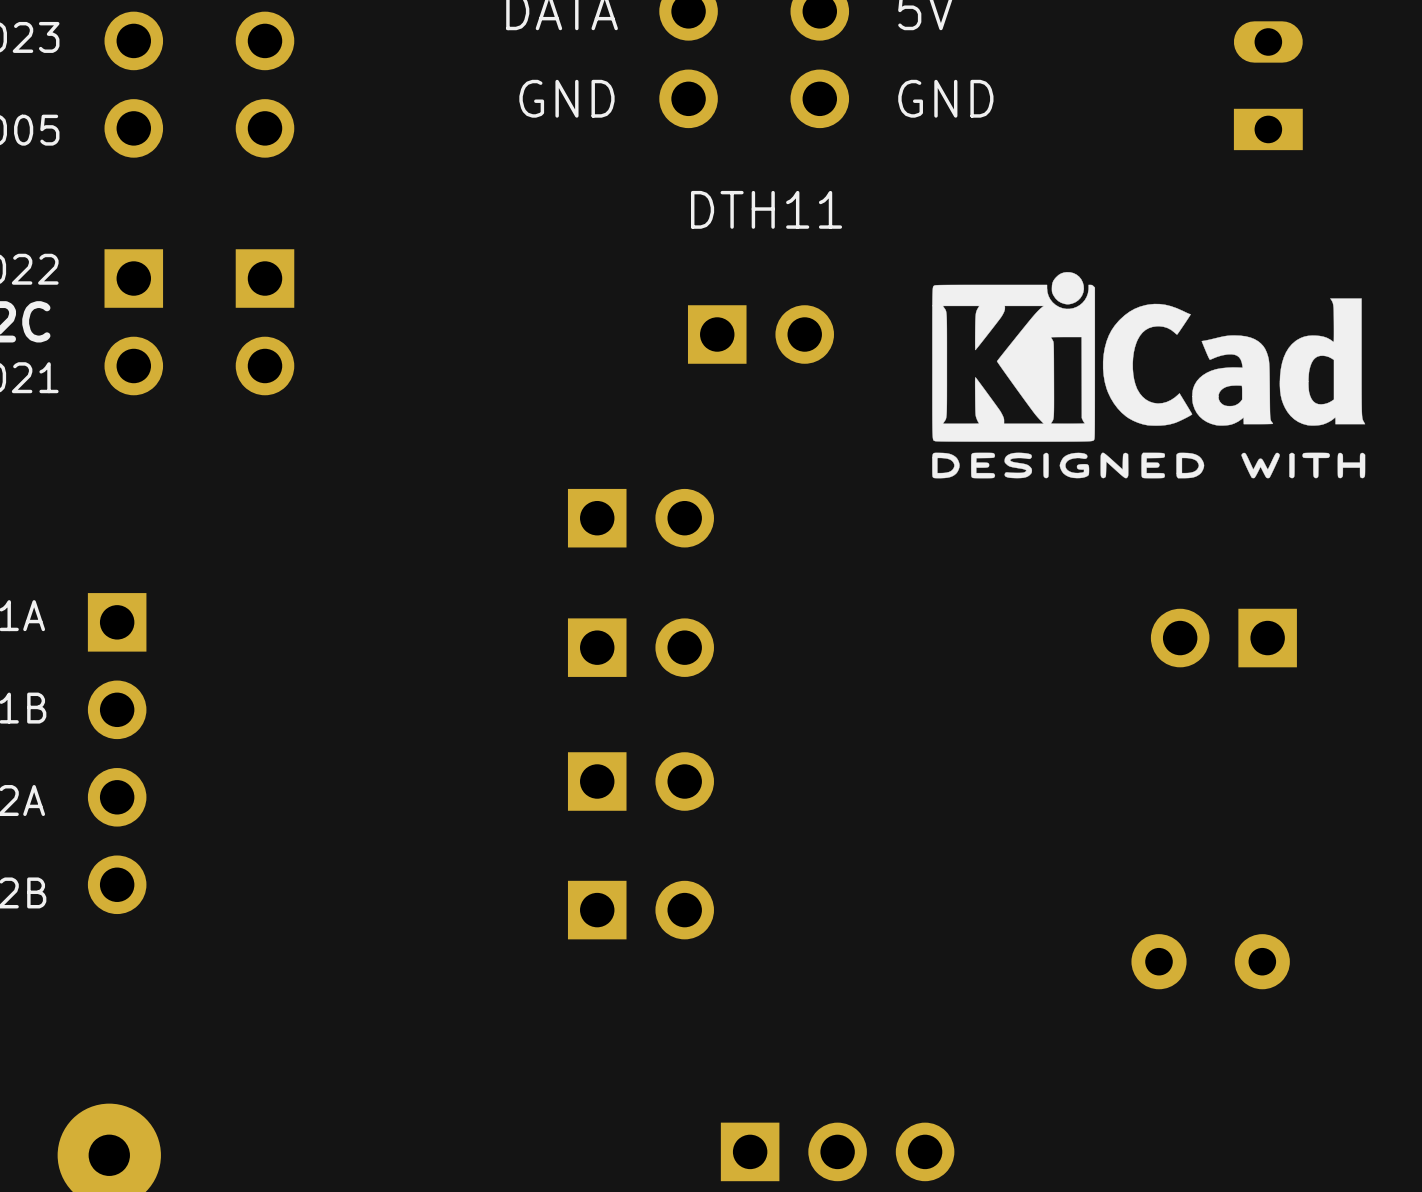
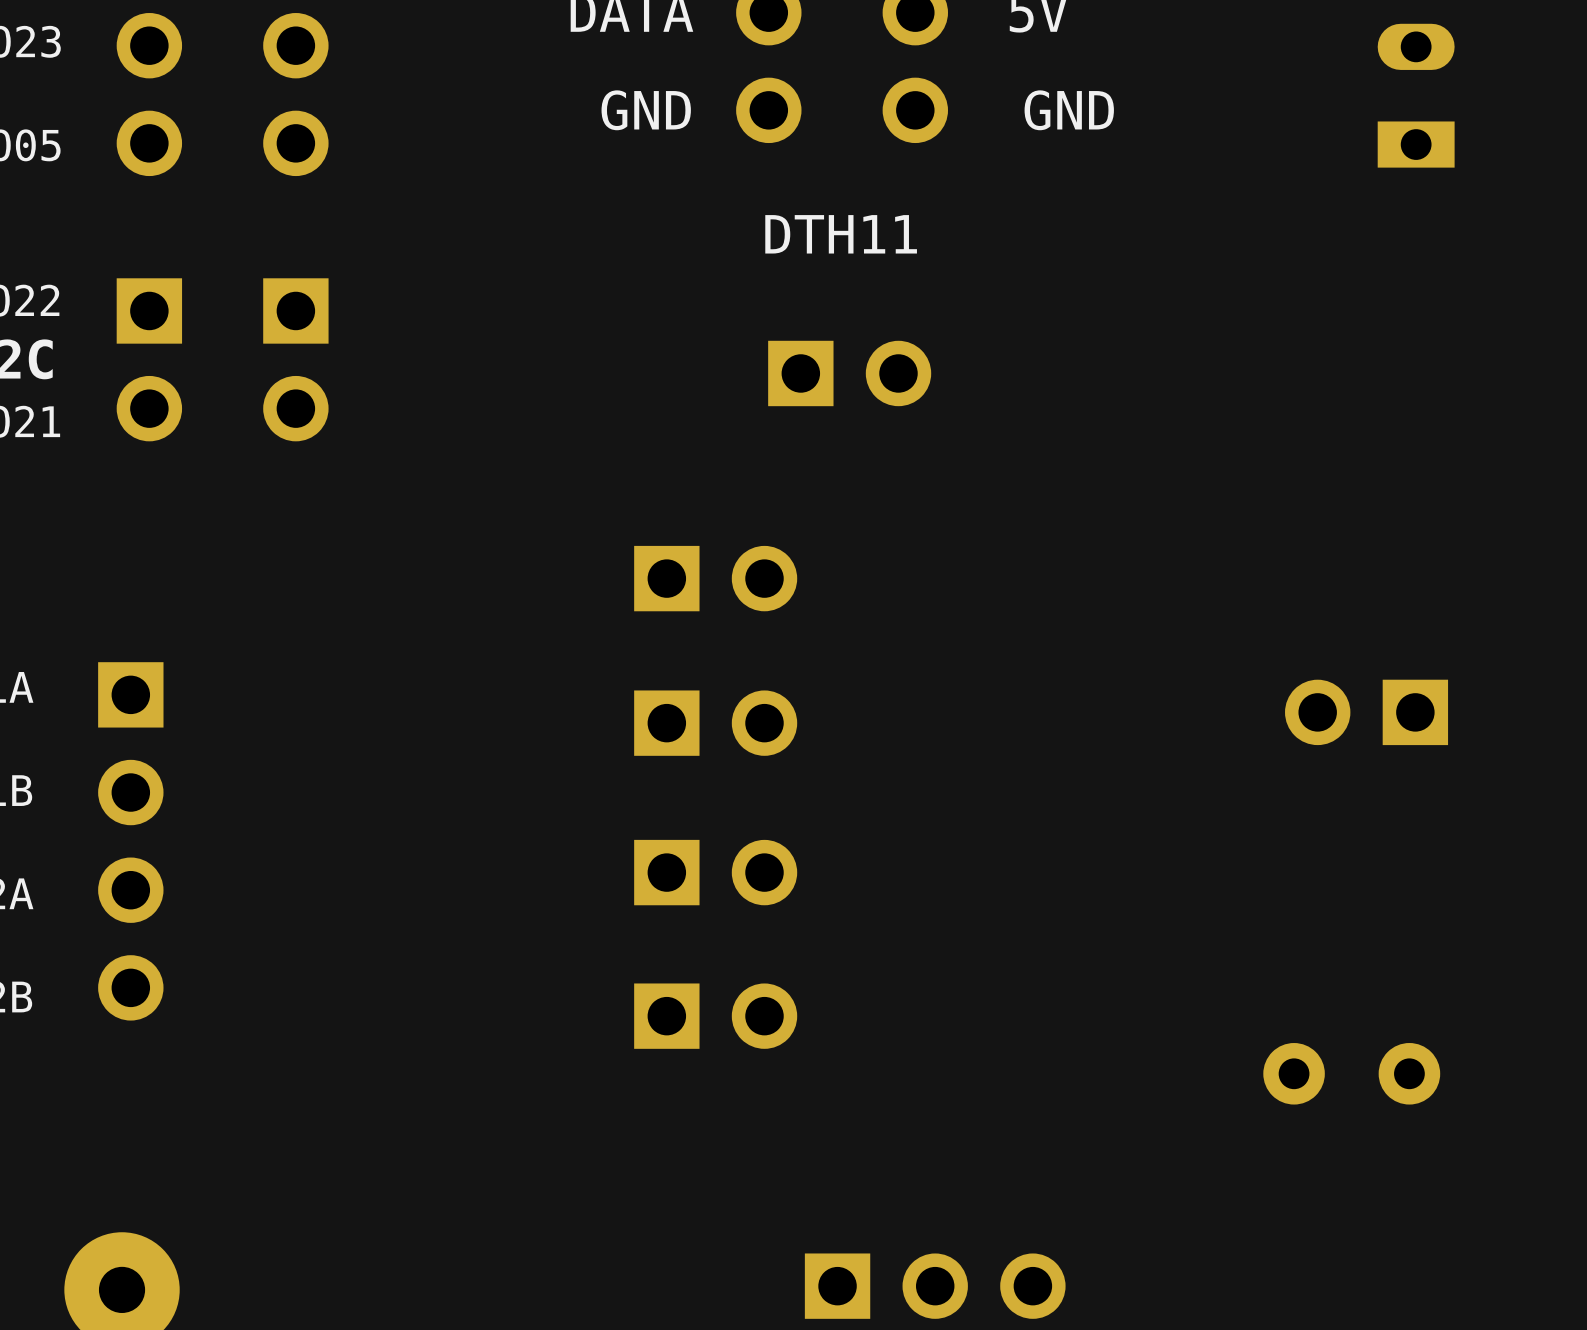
drawing: [932, 272, 1366, 479] -> none

